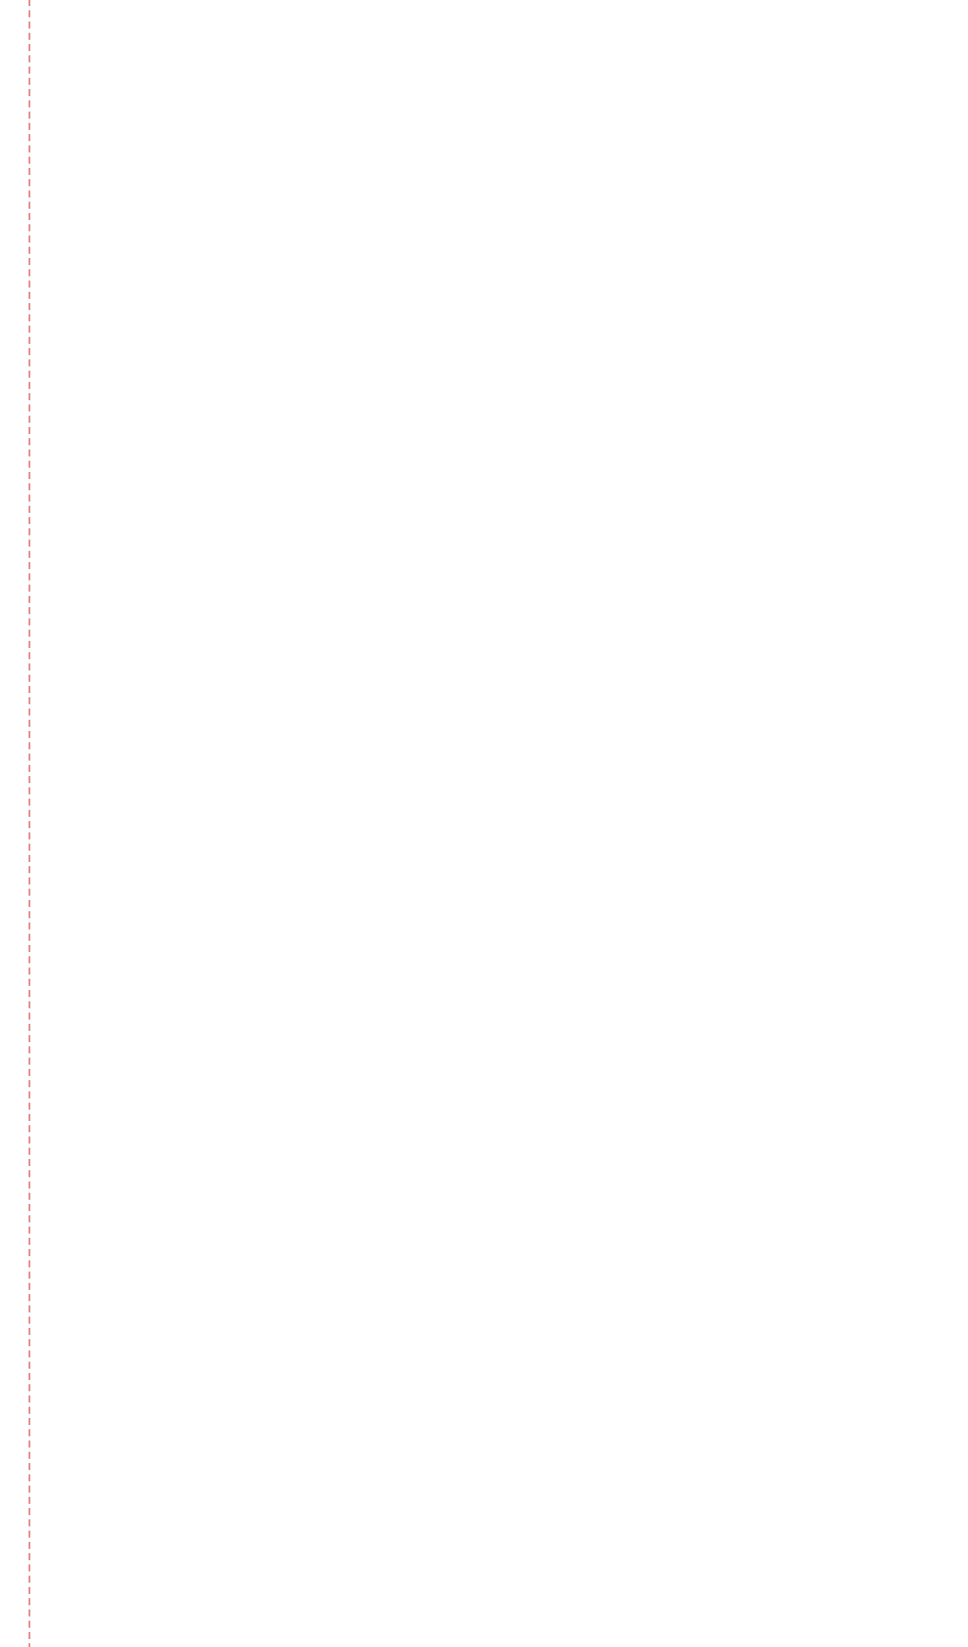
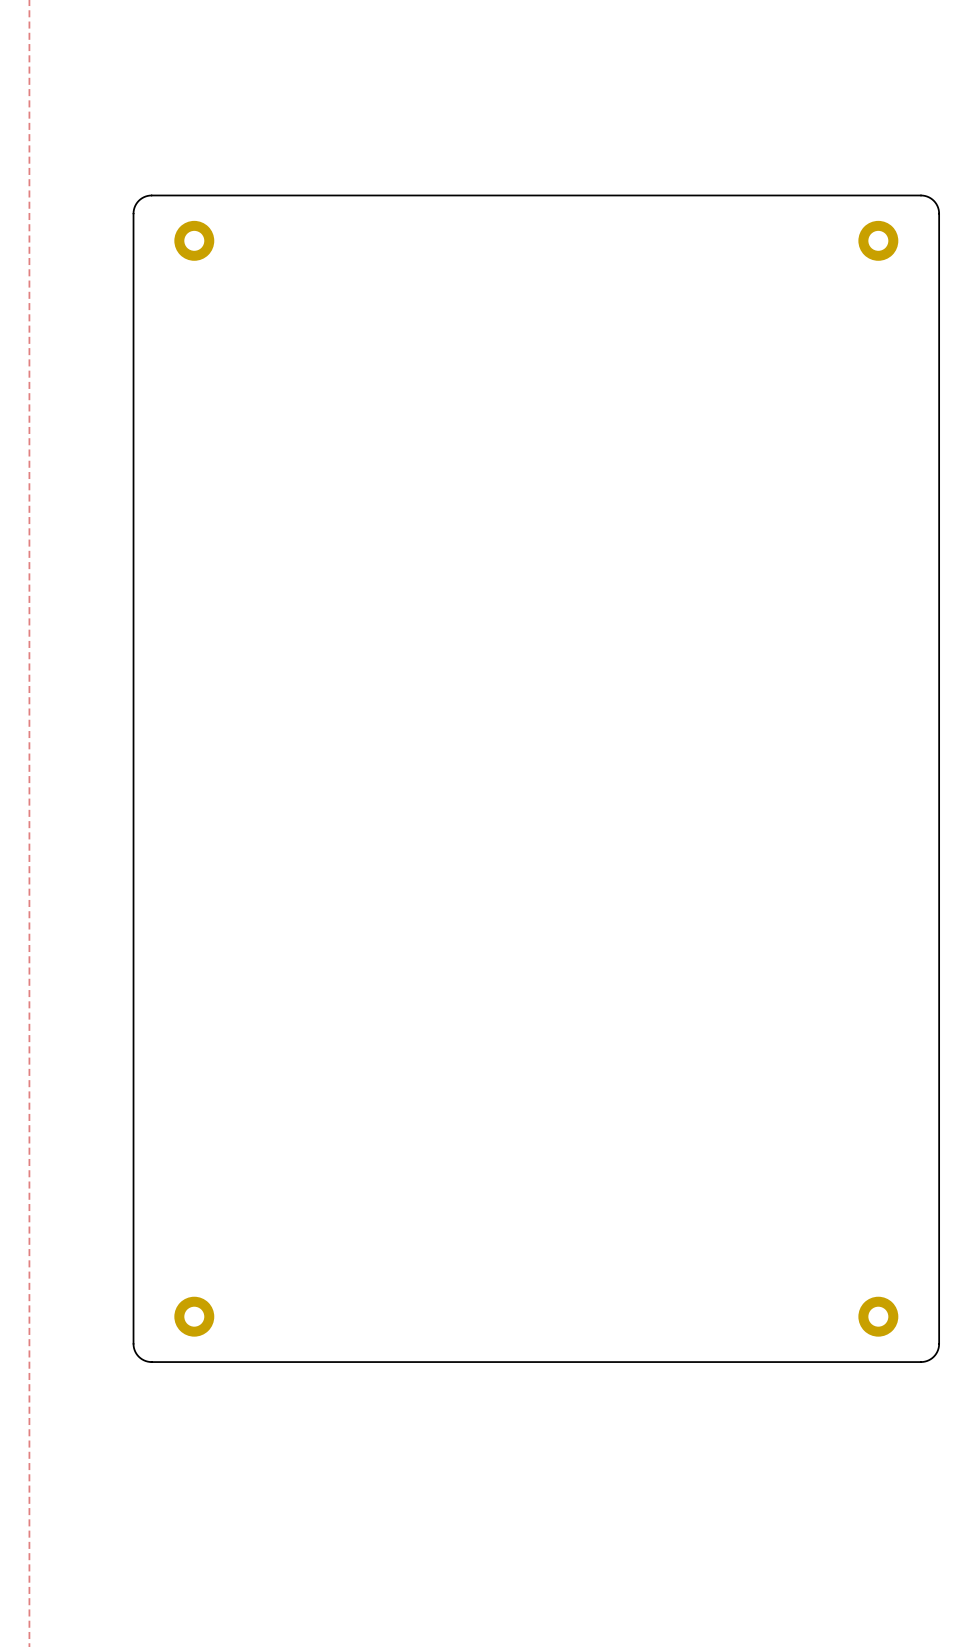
board edge: none -> (151, 195) (920, 195) (930, 198) (936, 203) (939, 213) (939, 1343) (937, 1351) (930, 1359) (920, 1362) (151, 1362) (142, 1359) (136, 1353) (133, 1343) (133, 213) (138, 200) (151, 195)
part: none -> (194, 240)
part: none -> (878, 240)
part: none -> (194, 1316)
part: none -> (878, 1316)

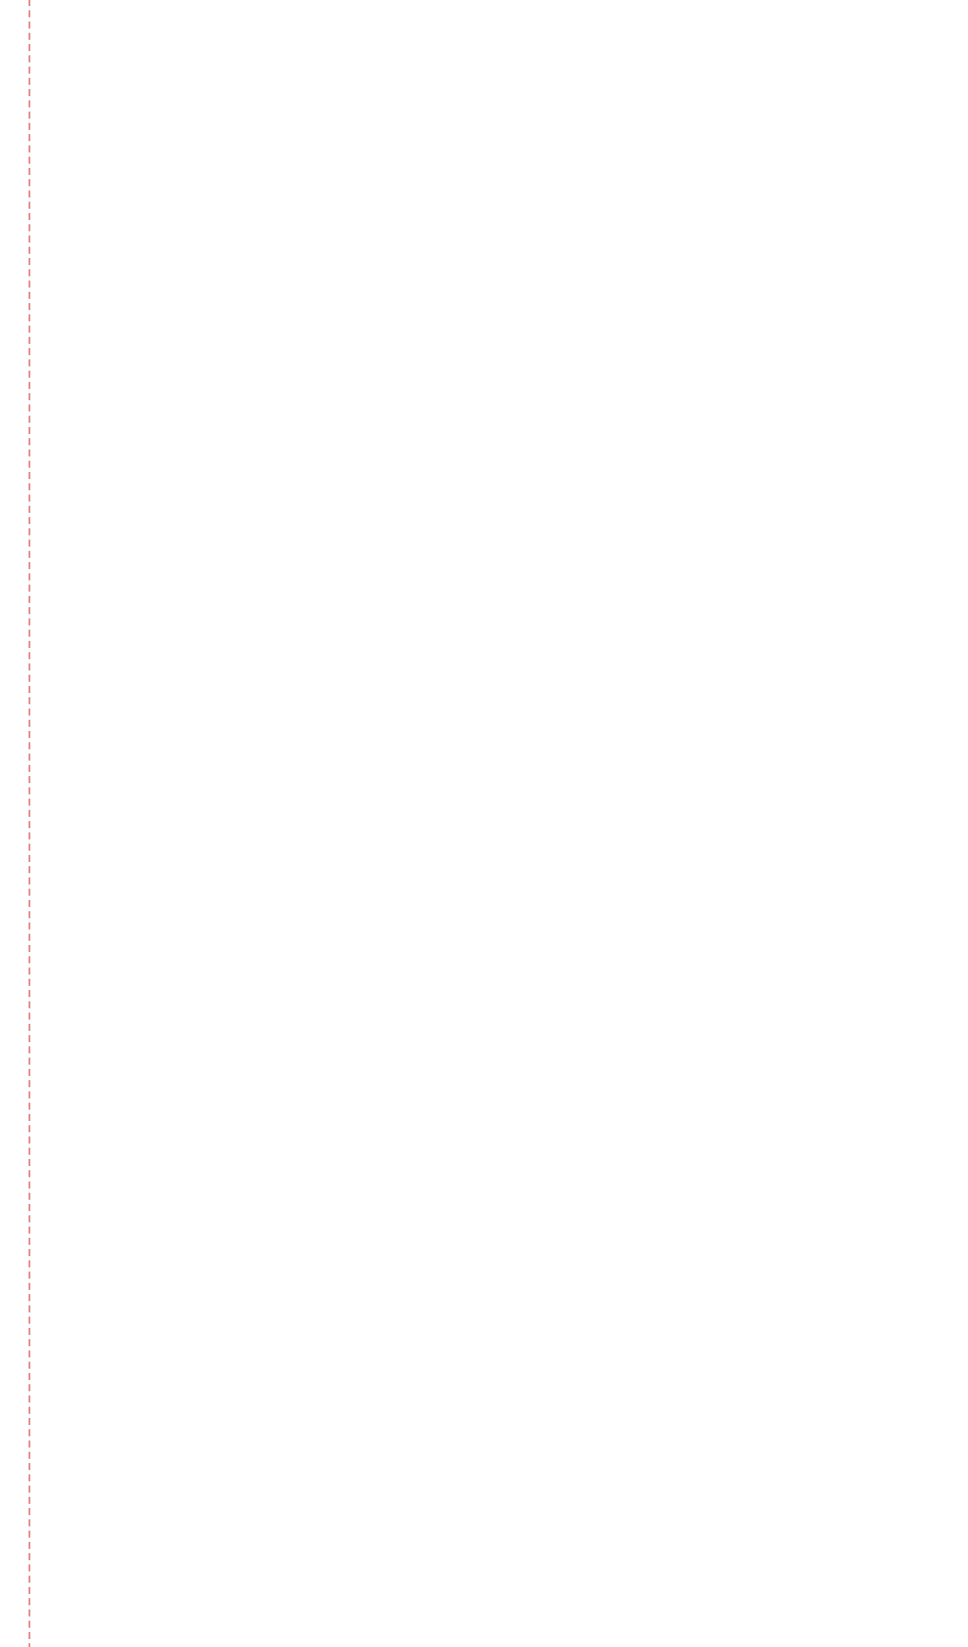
board edge: (151, 195) (920, 195) (930, 198) (936, 203) (939, 213) (939, 1343) (937, 1351) (930, 1359) (920, 1362) (151, 1362) (142, 1359) (136, 1353) (133, 1343) (133, 213) (138, 200) (151, 195) -> none
part: (194, 240) -> none
part: (878, 240) -> none
part: (194, 1316) -> none
part: (878, 1316) -> none

